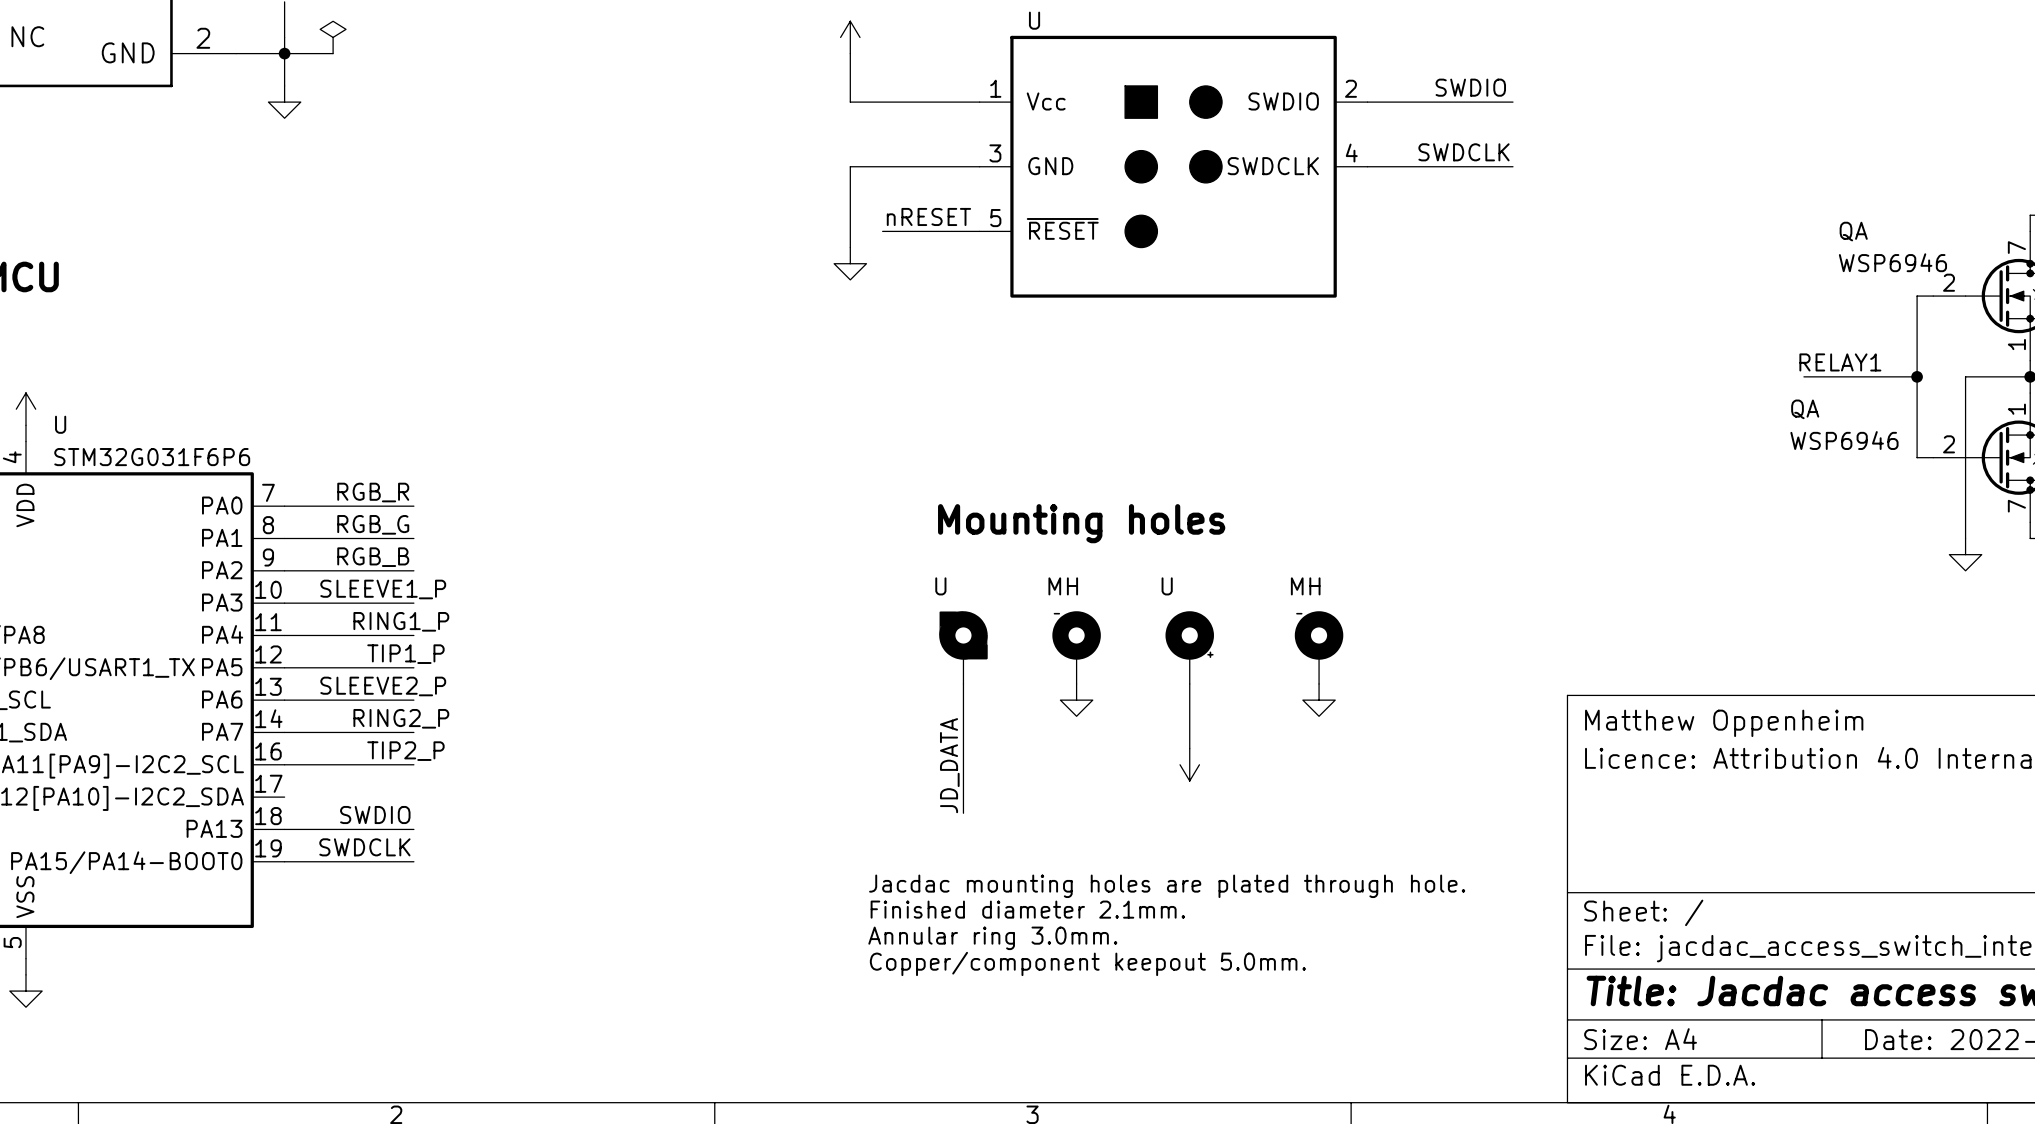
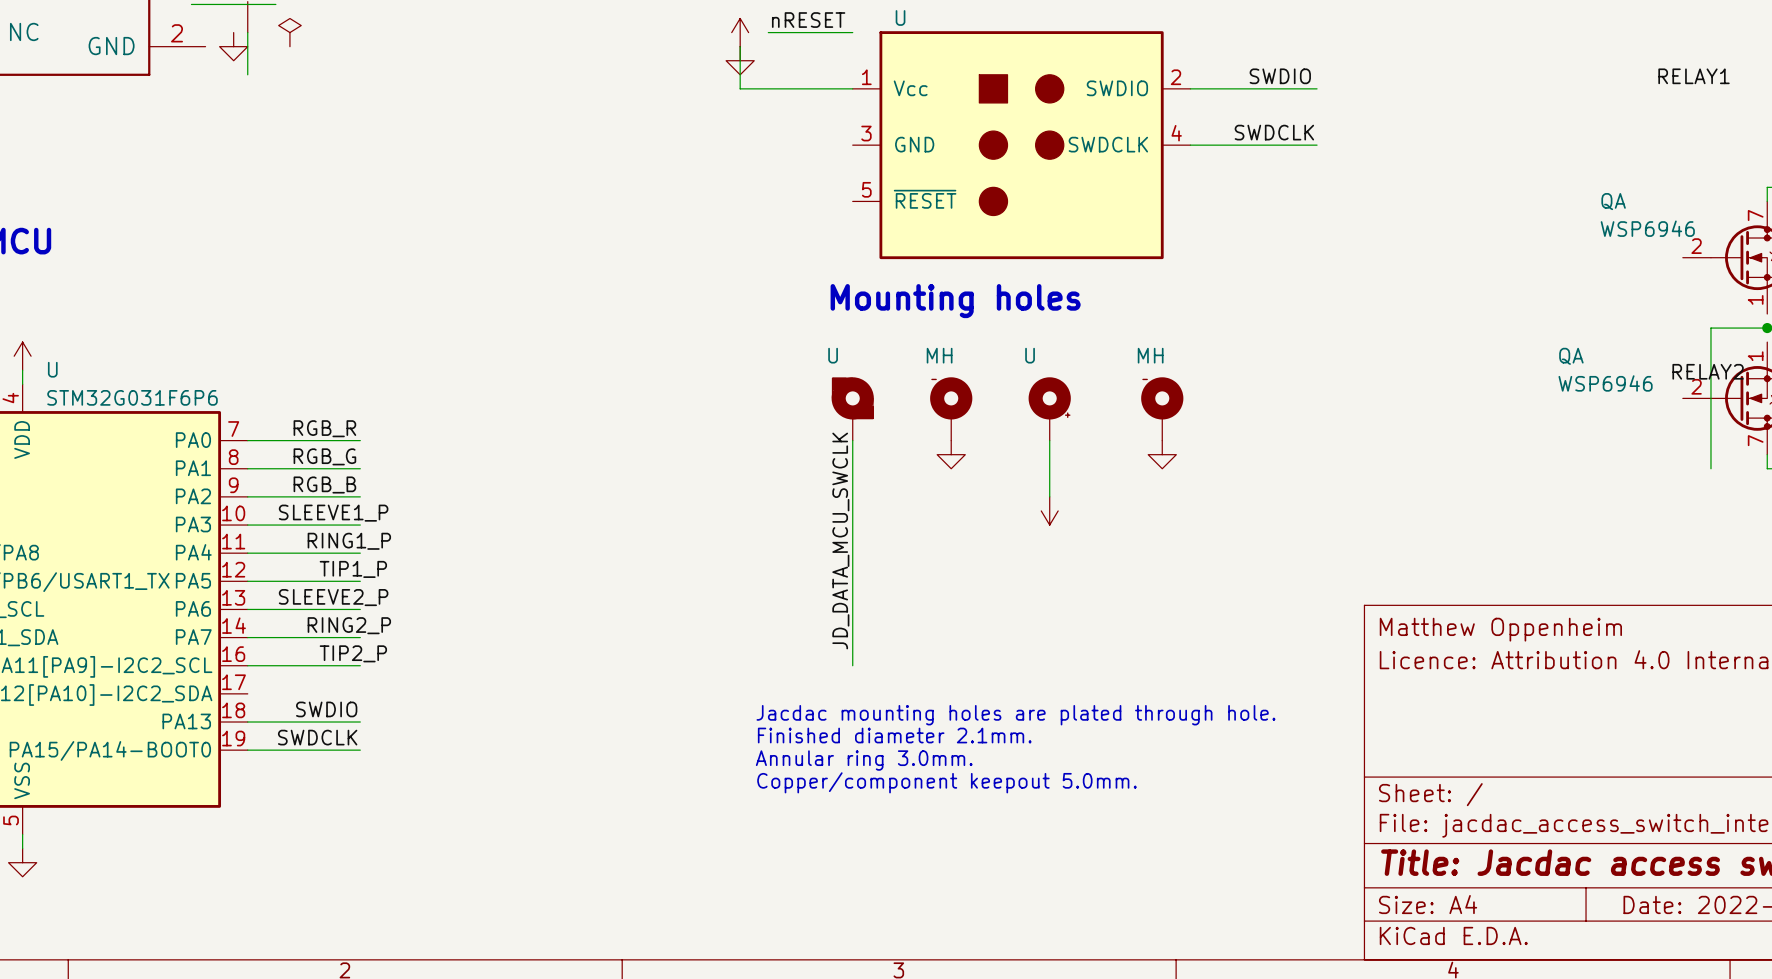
wire: (236, 53) (333, 53) -> (191, 4) (275, 4)
junction: (284, 53) -> none
power symbol: none -> (740, 60)
power symbol position: (284, 102) -> (233, 46)
wire: (979, 166) (850, 166) (850, 247) -> none
label position: nRESET (928, 216) -> nRESET (808, 20)
wire: (882, 231) (979, 231) -> (768, 32) (852, 32)
power symbol: (850, 263) -> none
wire: (1933, 296) (1917, 296) (1917, 457) (1933, 457) -> none
wire: (2030, 360) (2030, 393) -> none
label position: RELAY1 (1840, 362) -> RELAY1 (1694, 76)
wire: (1803, 376) (1917, 376) -> none
junction: (1917, 376) -> none
label: none -> RELAY2 (1708, 371)
MH: none -> (951, 408)
MH: none -> (1162, 408)
wire: none -> (852, 440) (852, 665)
power symbol: none -> (951, 454)
power symbol: none -> (1162, 454)
text position: Mounting holes (1081, 523) -> Mounting holes (955, 301)
power symbol: (1965, 554) -> none
label: none -> JD_DATA_MCU_SWCLK (840, 541)
U position: (963, 647) -> (852, 408)
MH: (1076, 647) -> none
U position: (1189, 647) -> (1049, 408)
MH: (1319, 647) -> none
wire: (963, 683) (963, 813) -> none
wire: (1189, 683) (1189, 748) -> (1049, 440) (1049, 496)
power symbol: (1076, 700) -> none
power symbol: (1319, 700) -> none
power symbol position: (1189, 764) -> (1049, 510)
label: JD_DATA (949, 765) -> none
text position: Jacdac mounting holes are plated through hole. (1167, 886) -> Jacdac mounting holes are plated through hole. (1015, 715)
text position: Finished diameter 2.1mm. (1027, 909) -> Finished diameter 2.1mm. (894, 735)
text position: Annular ring 3.0mm. (992, 938) -> Annular ring 3.0mm. (864, 760)
text position: Copper/component keepout 5.0mm. (1087, 963) -> Copper/component keepout 5.0mm. (946, 782)

